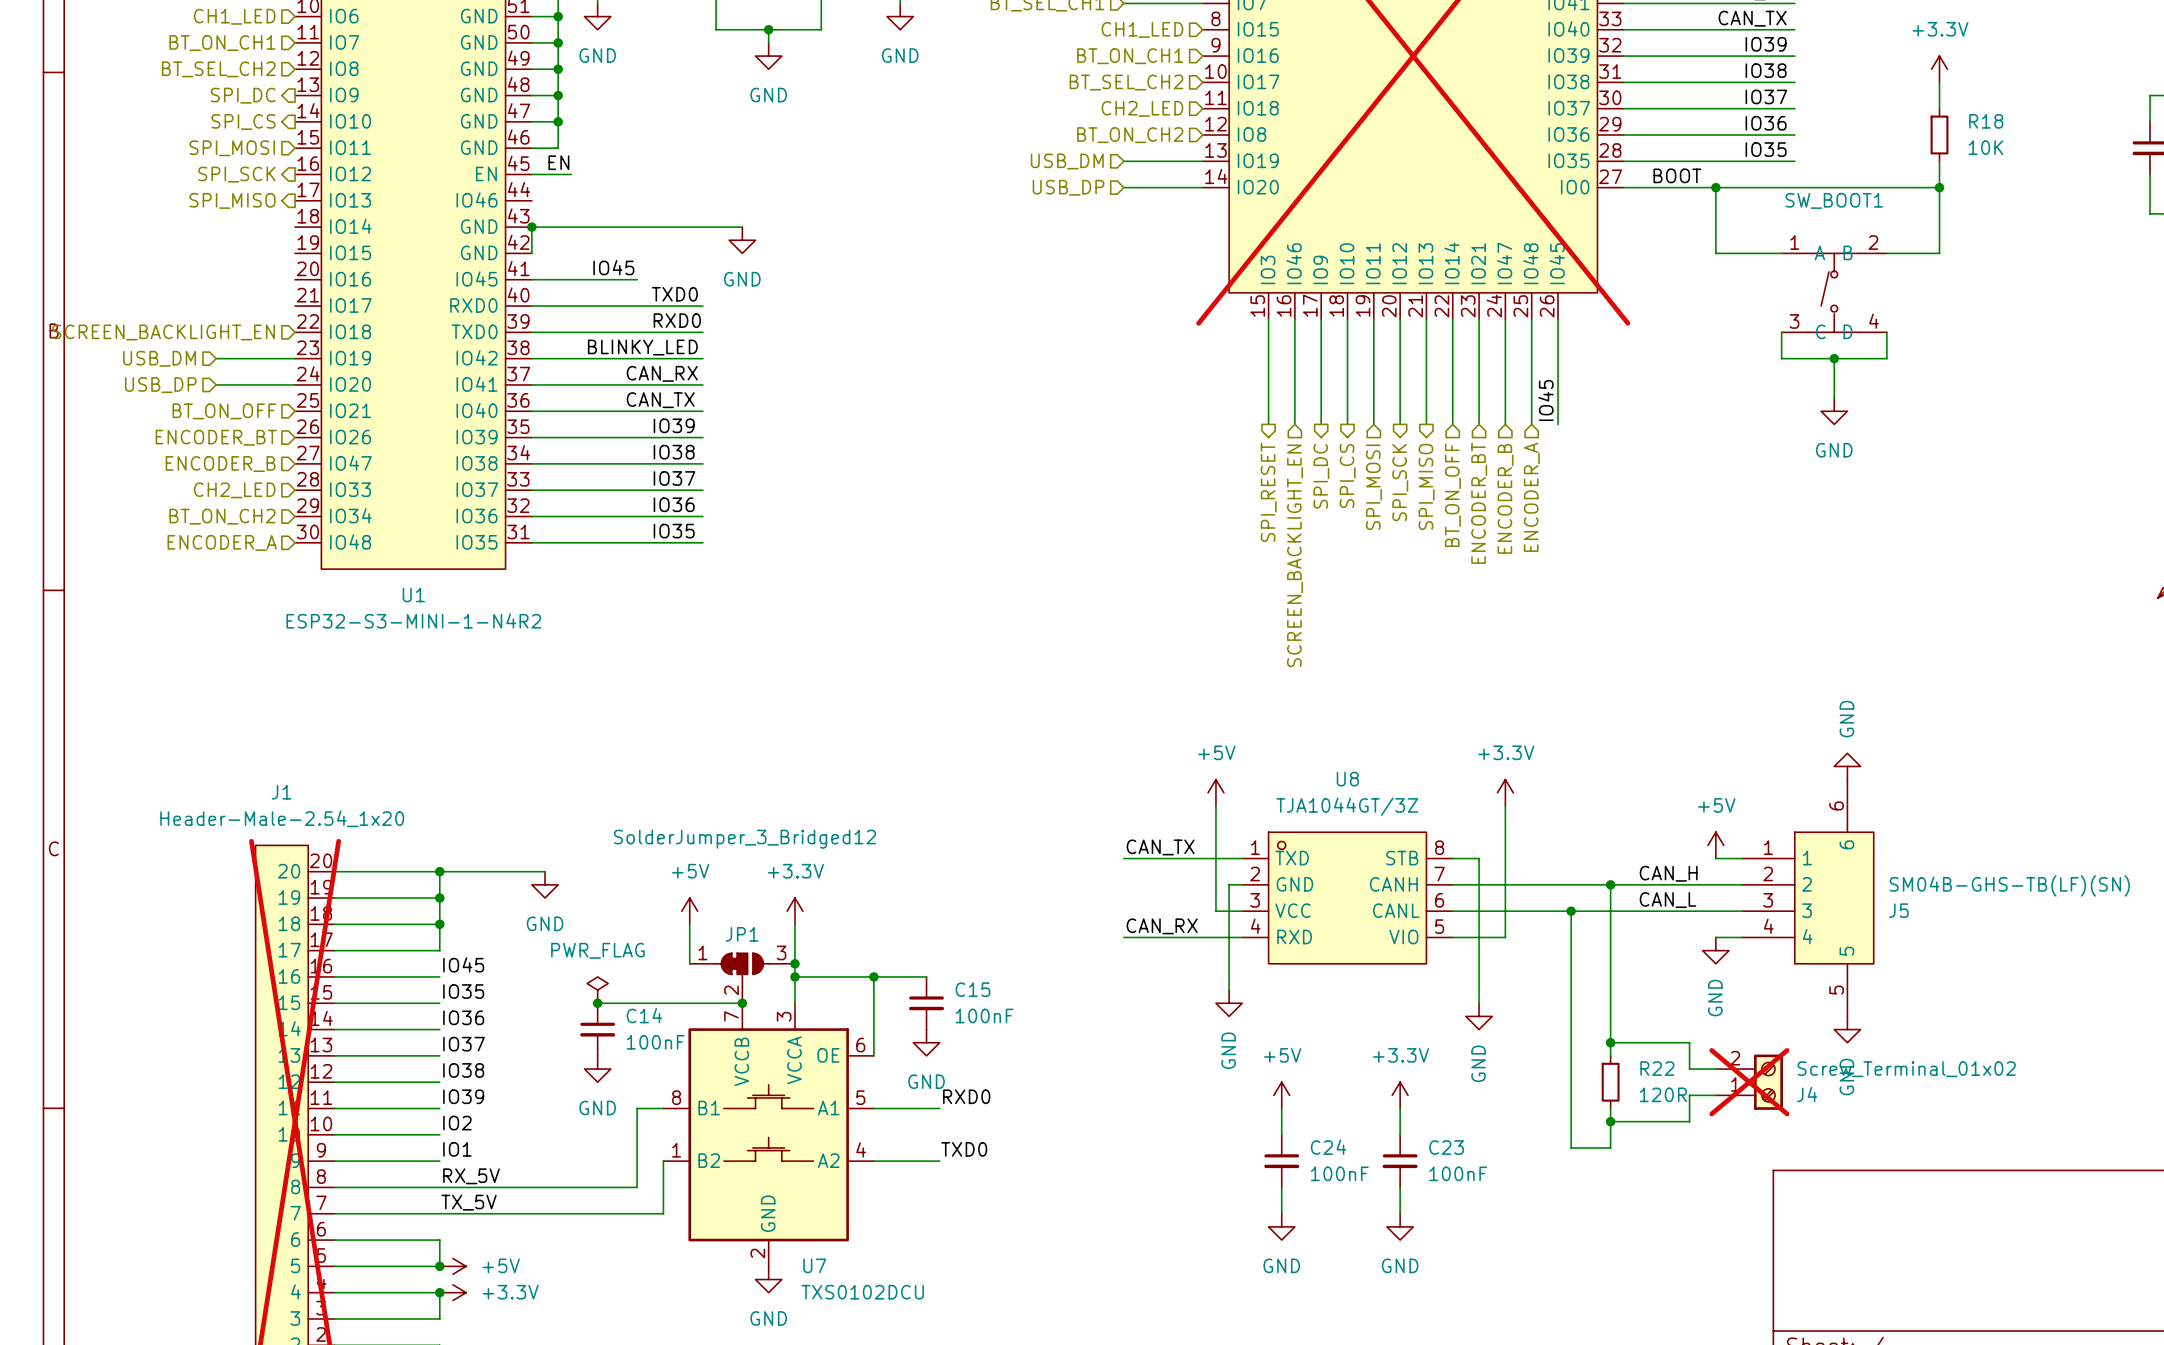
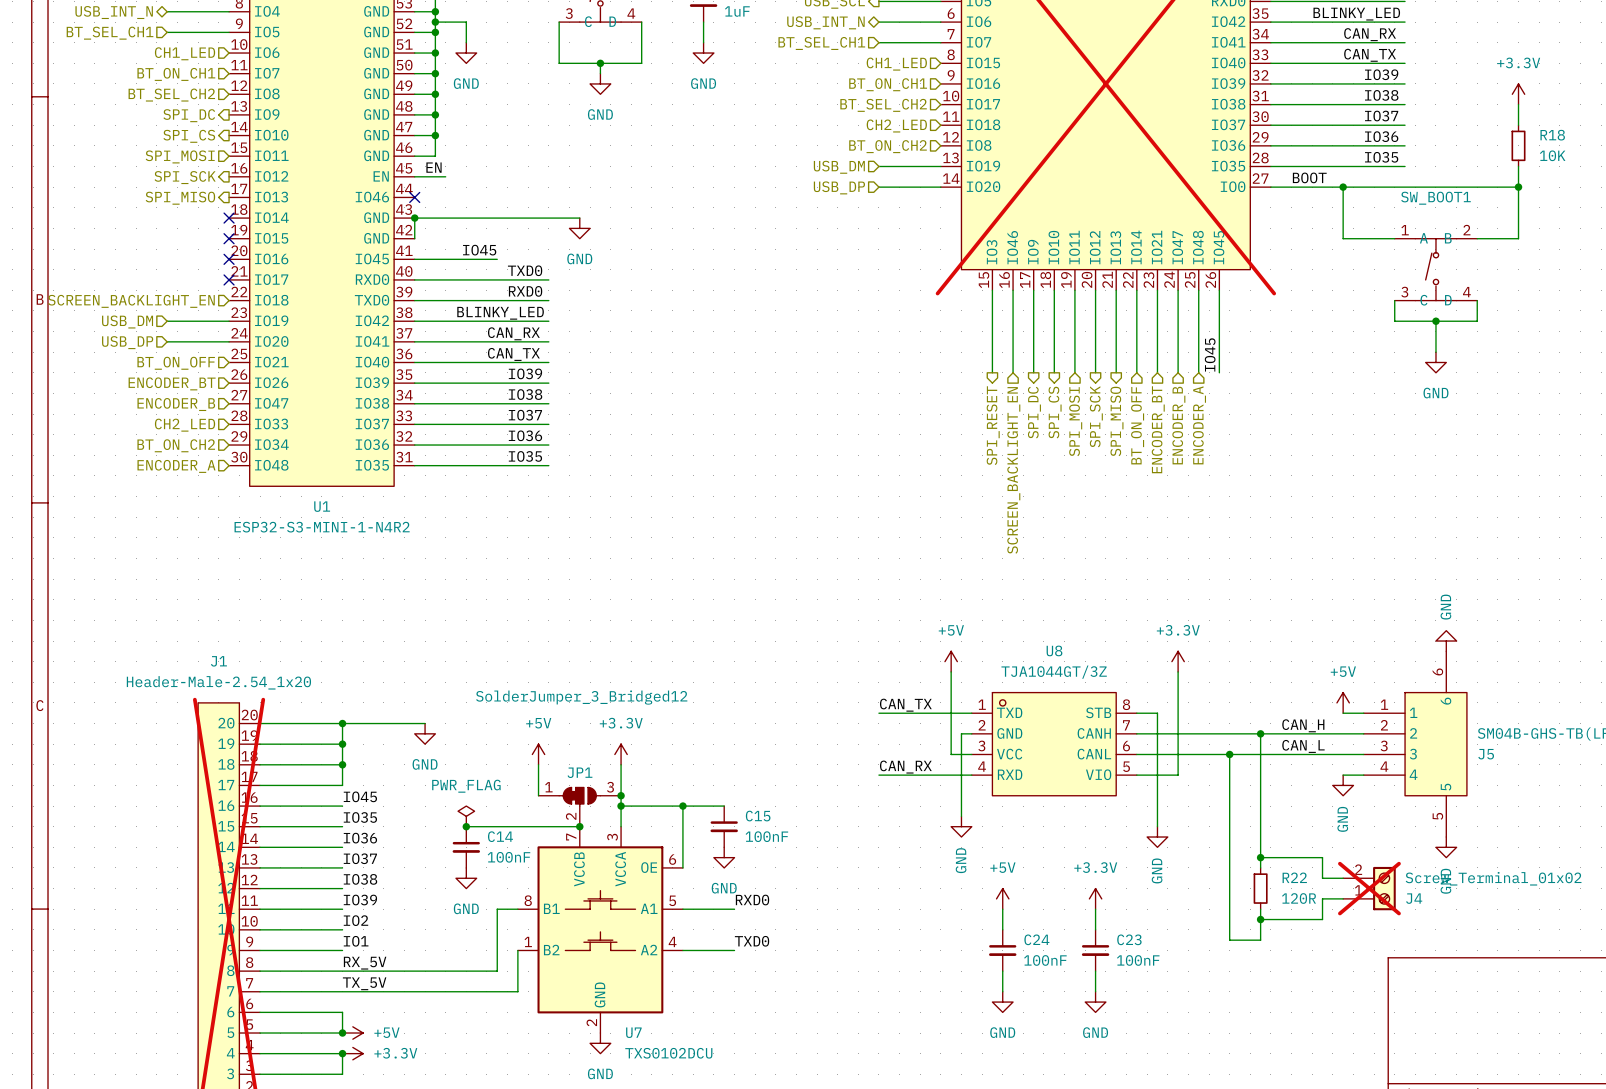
no-connect mark: none -> (414, 197)
no-connect mark: none -> (229, 218)
no-connect mark: none -> (229, 238)
no-connect mark: none -> (229, 259)
no-connect mark: none -> (229, 279)

